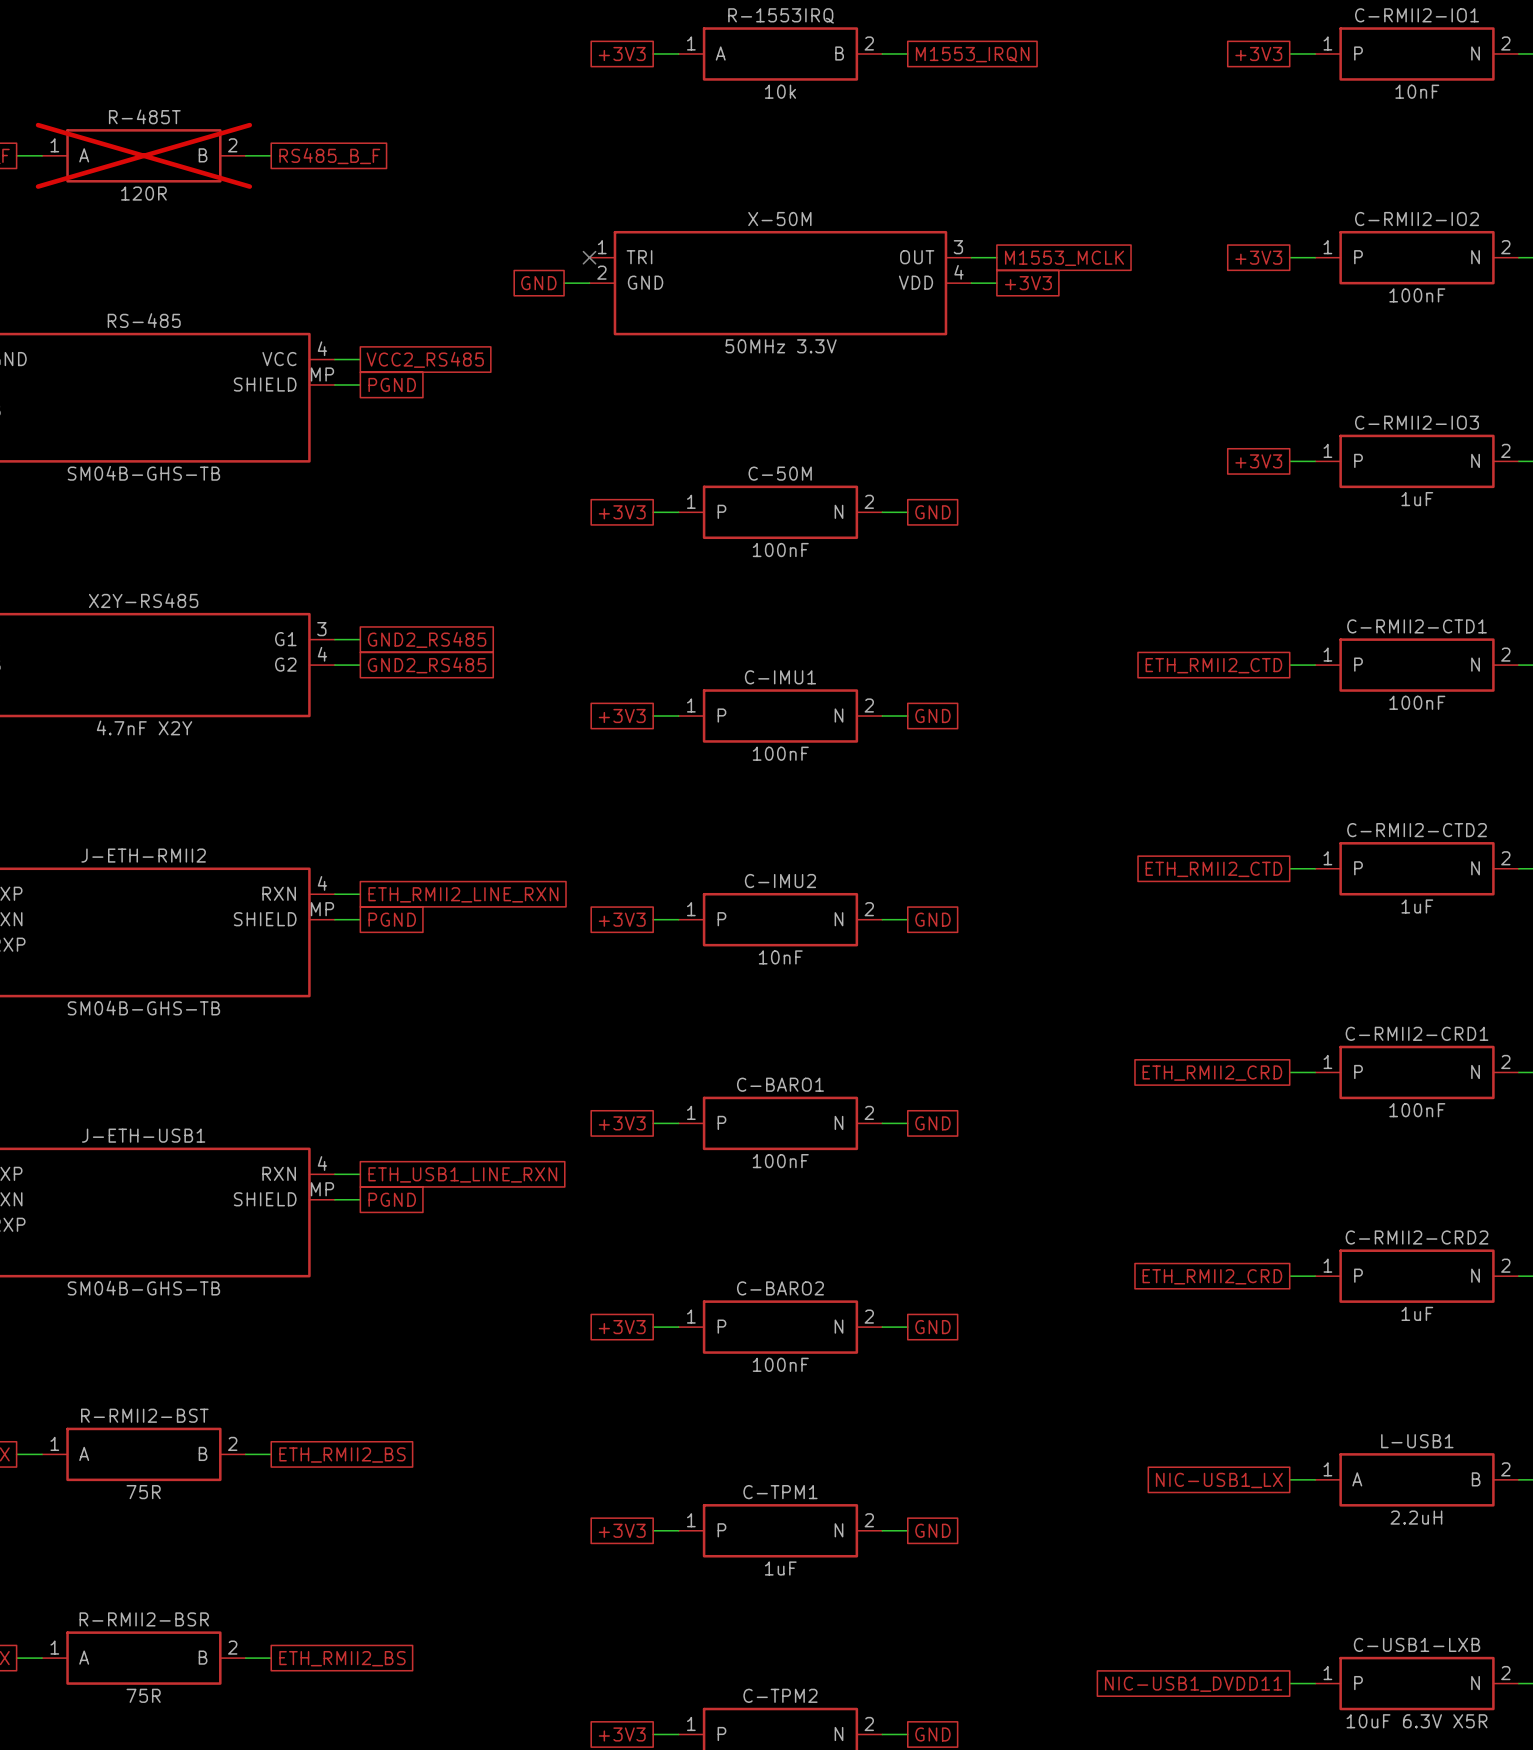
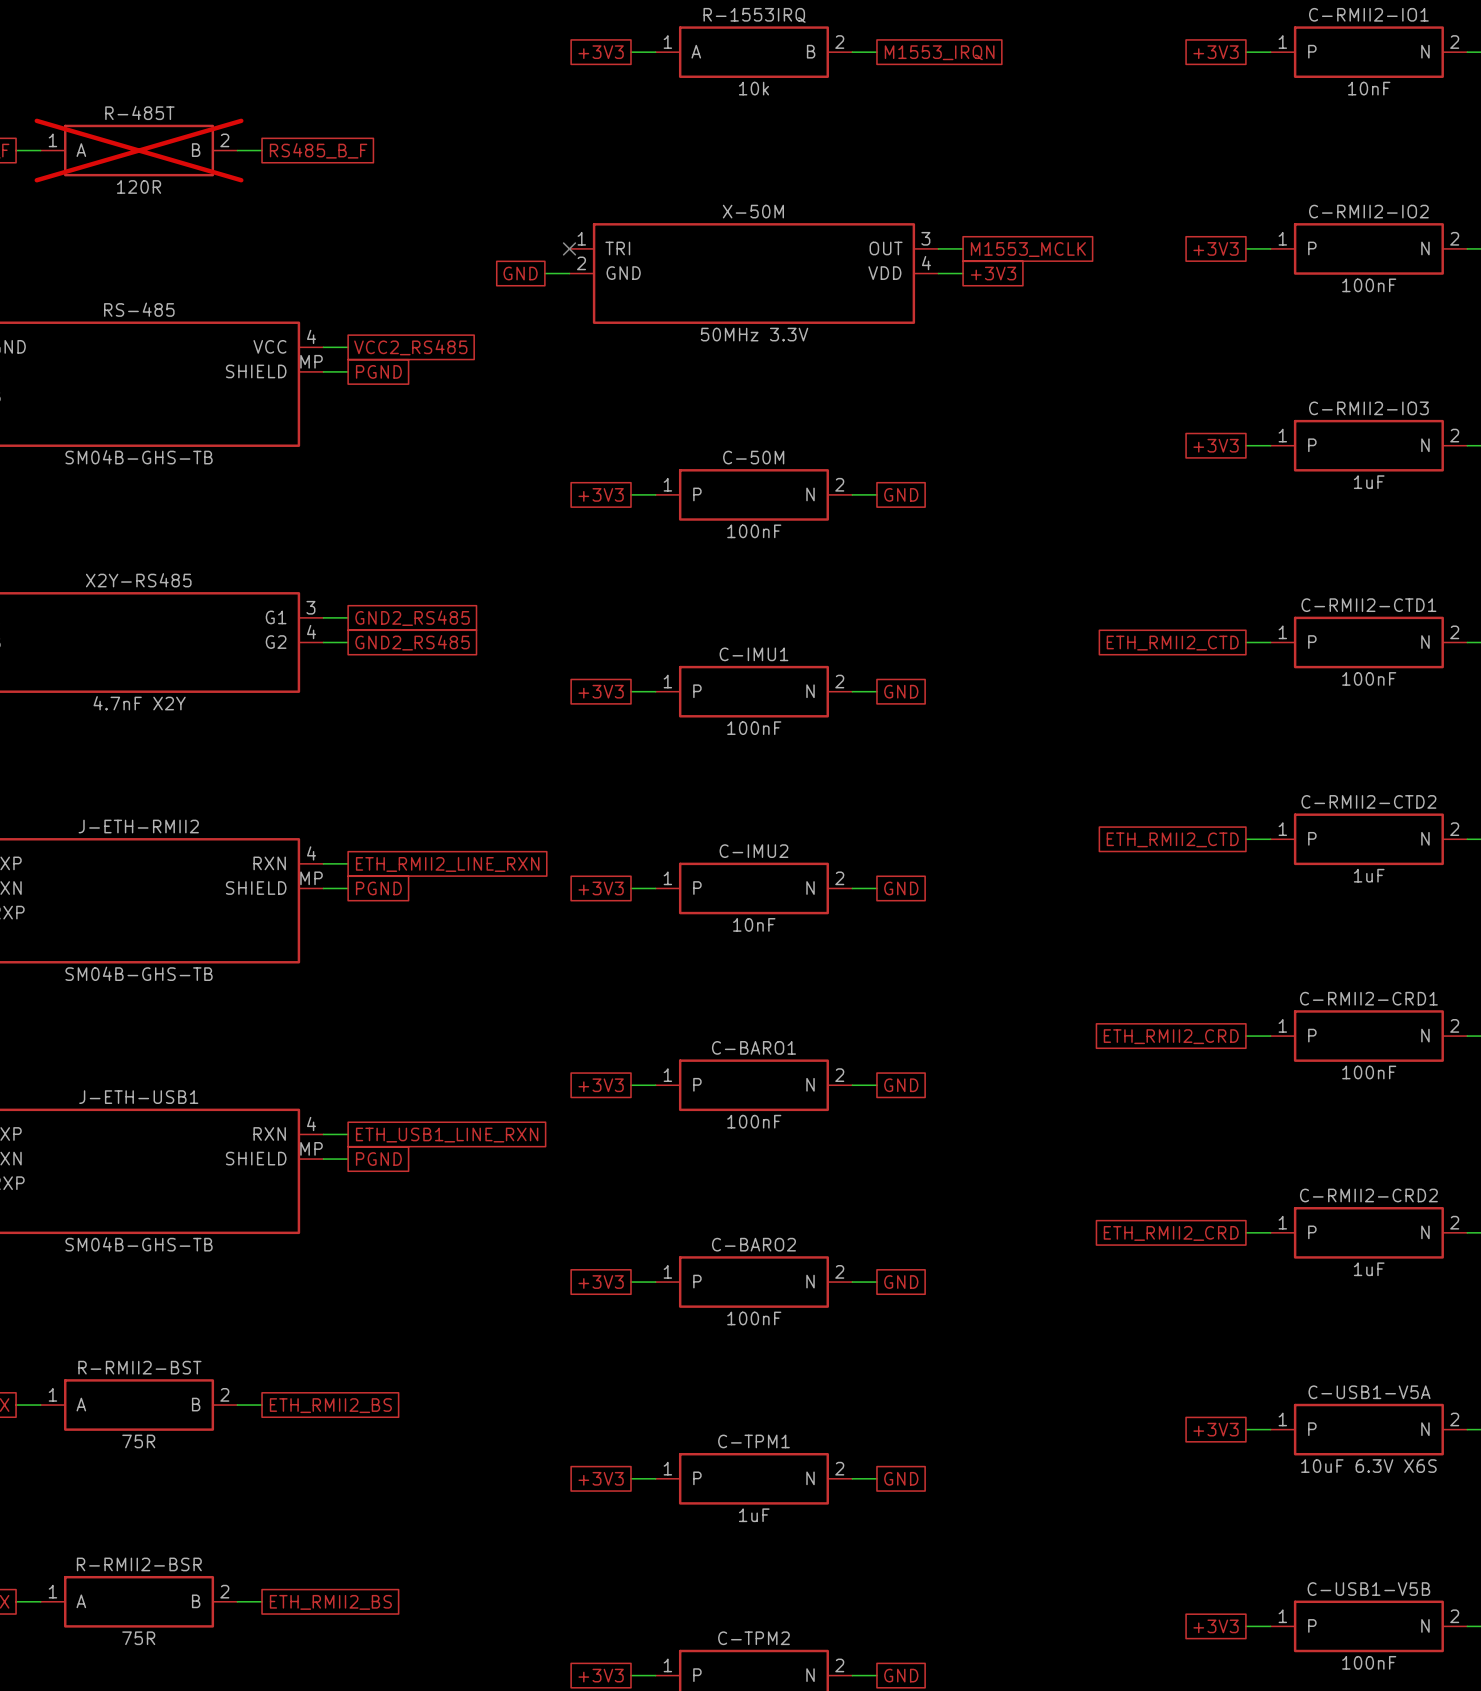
L-USB1 name: L-USB1 (1417, 1441) -> C-USB1-V5A (1369, 1392)
L-USB1 pin name: A (1357, 1479) -> P (1312, 1429)
L-USB1 pin name: B (1476, 1479) -> N (1425, 1429)
global label: NIC-USB1_LX (1219, 1480) -> +3V3 (1216, 1429)
L-USB1 value: 2.2uH (1416, 1517) -> 10uF 6.3V X6S (1368, 1466)
C-USB1-LXB name: C-USB1-LXB (1417, 1644) -> C-USB1-V5B (1368, 1589)
global label: NIC-USB1_DVDD11 (1193, 1684) -> +3V3 (1216, 1626)
C-USB1-LXB value: 10uF 6.3V X5R (1417, 1721) -> 100nF (1369, 1662)

